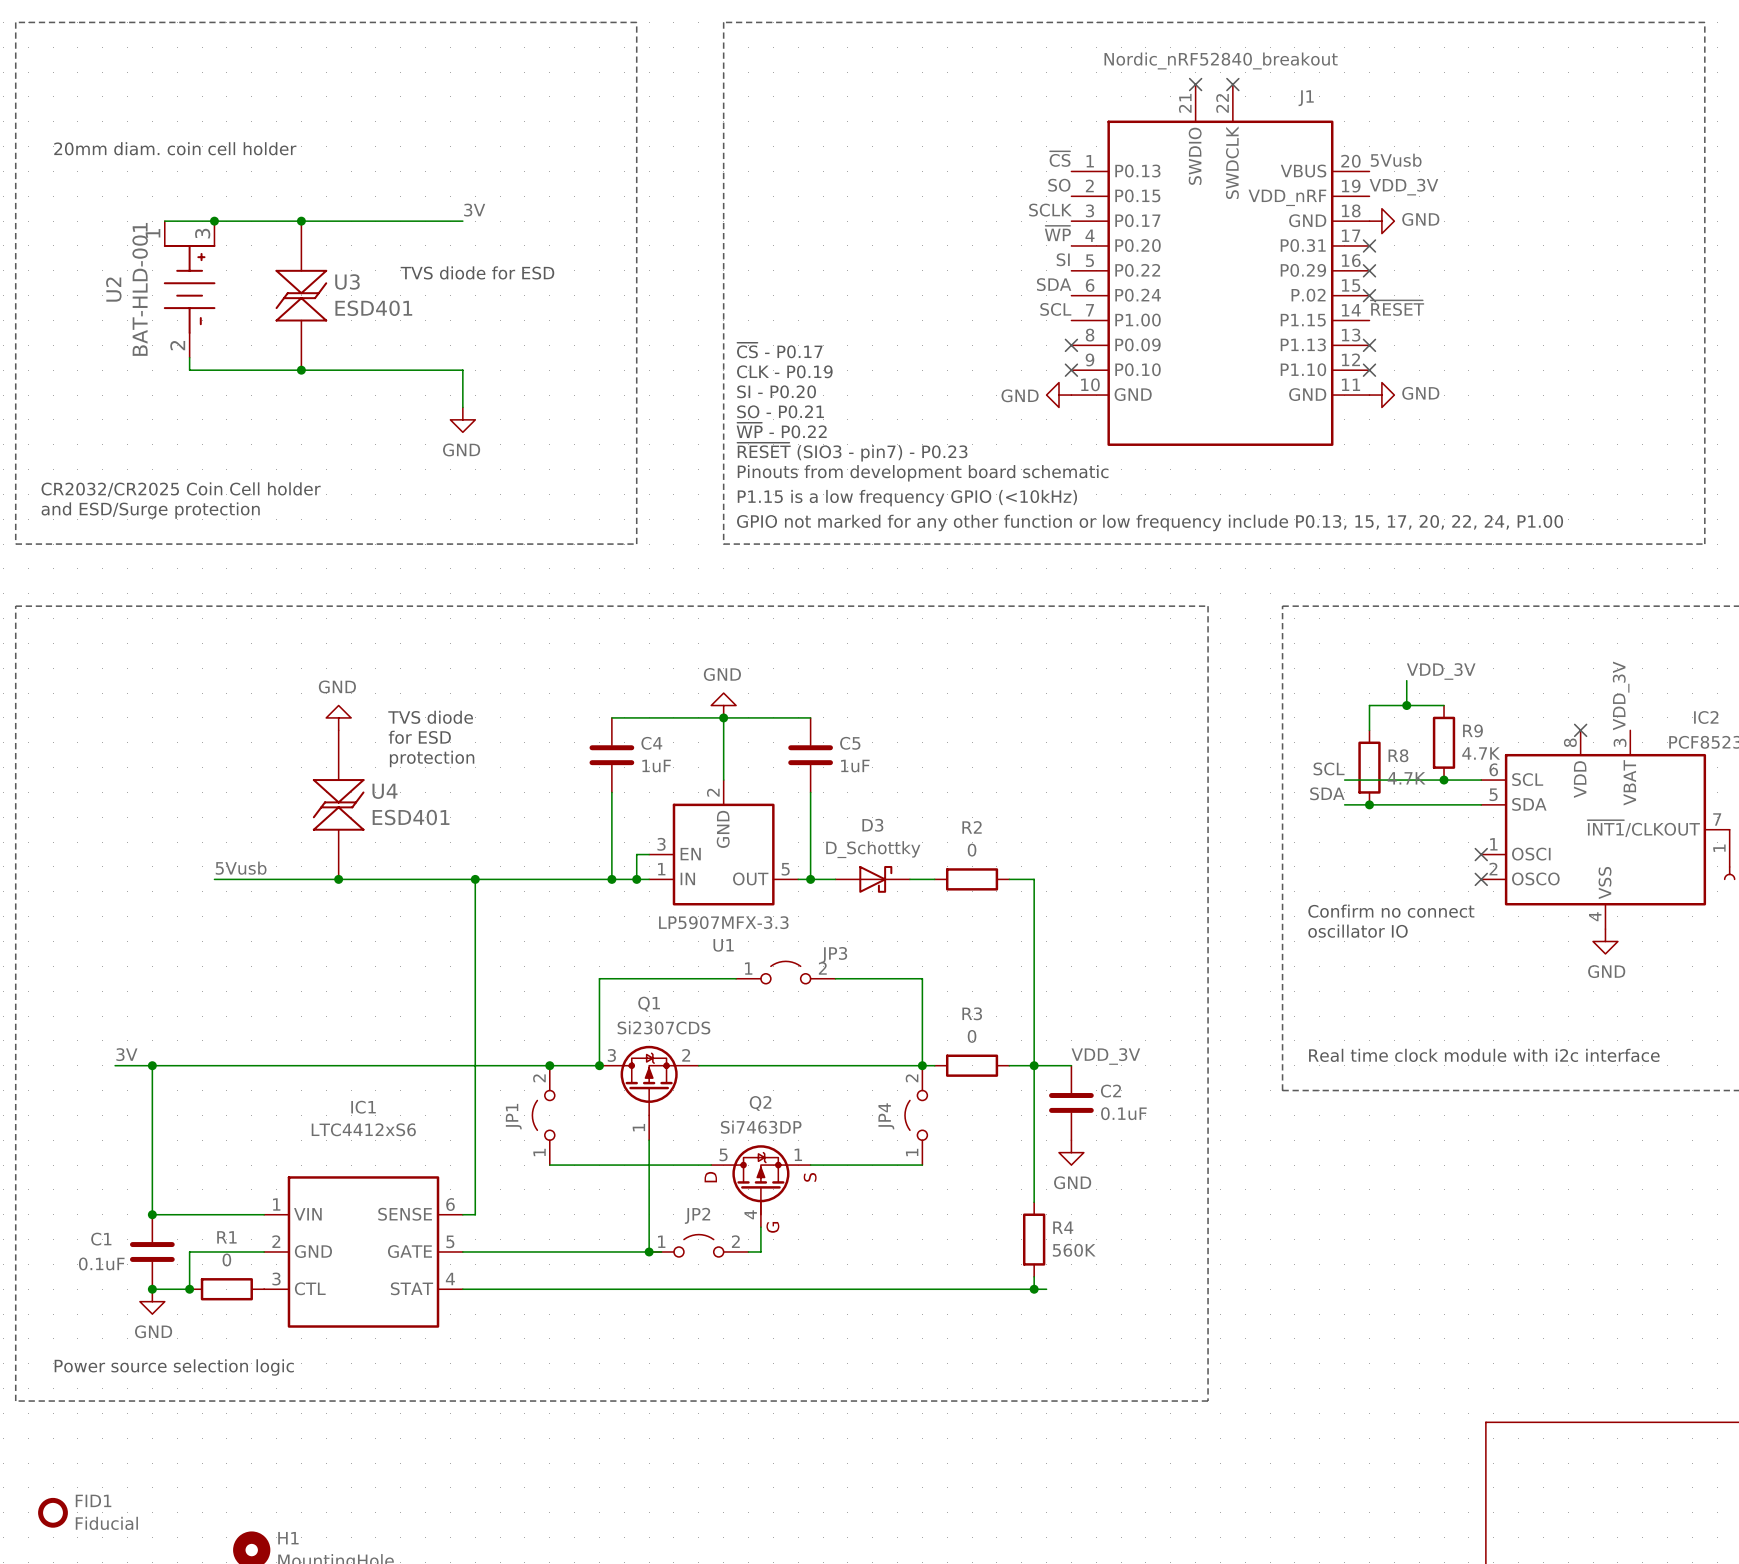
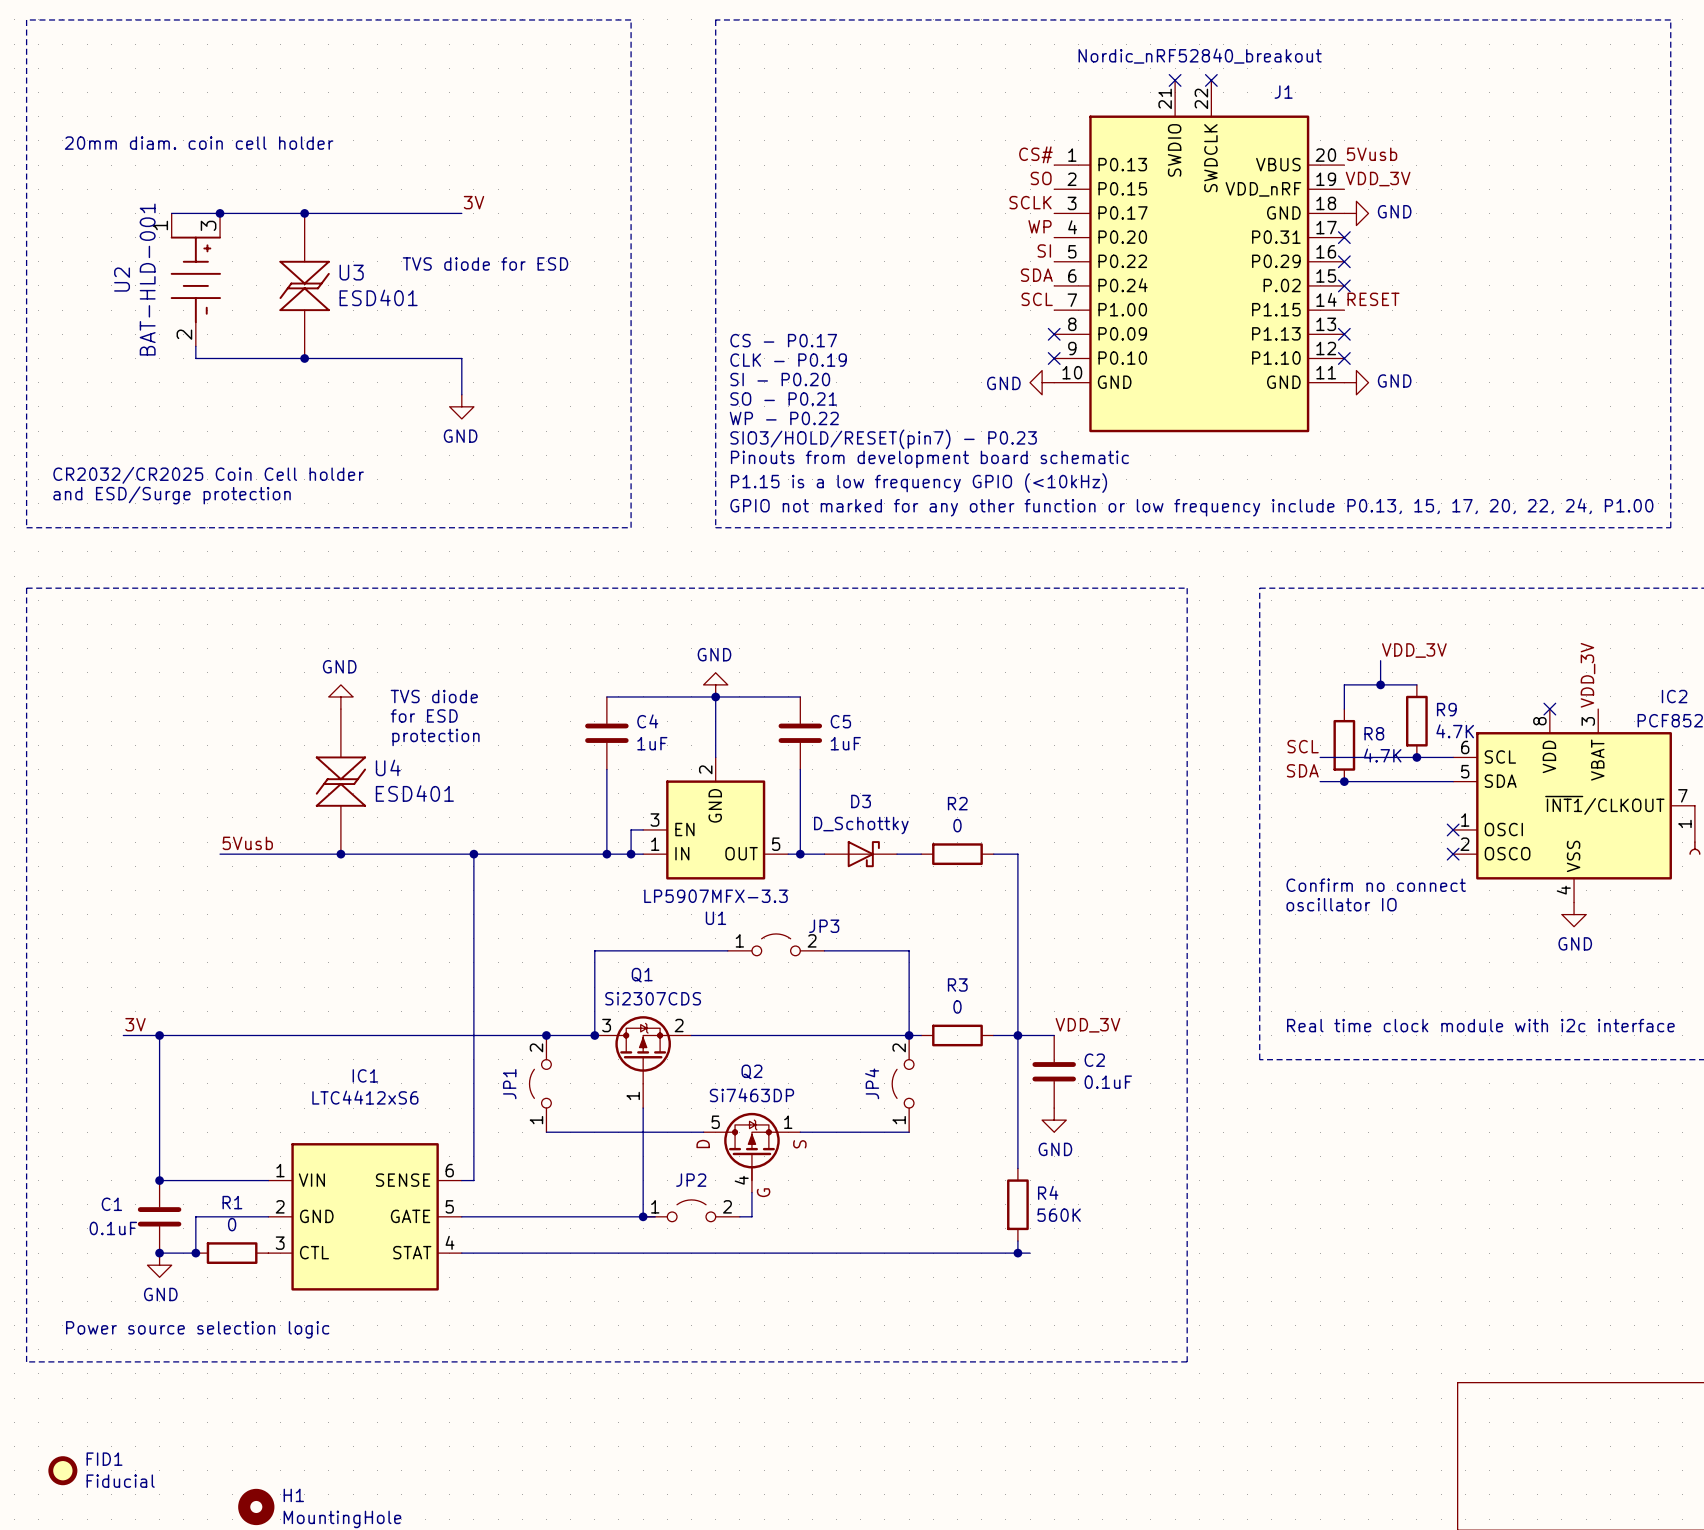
label: ~{CS} (1060, 159) -> CS# (1035, 154)
label: ~{WP} (1057, 233) -> WP (1040, 226)
label: ~{RESET} (1397, 308) -> RESET (1373, 299)
text: ~{CS} - P0.17 (779, 350) -> CS - P0.17 (783, 340)
text: ~{WP} - P0.22 (781, 430) -> WP - P0.22 (784, 418)
text: ~{RESET} (SIO3 - pin7) - P0.23 (852, 452) -> SIO3/HOLD/RESET(pin7) - P0.23 (883, 439)

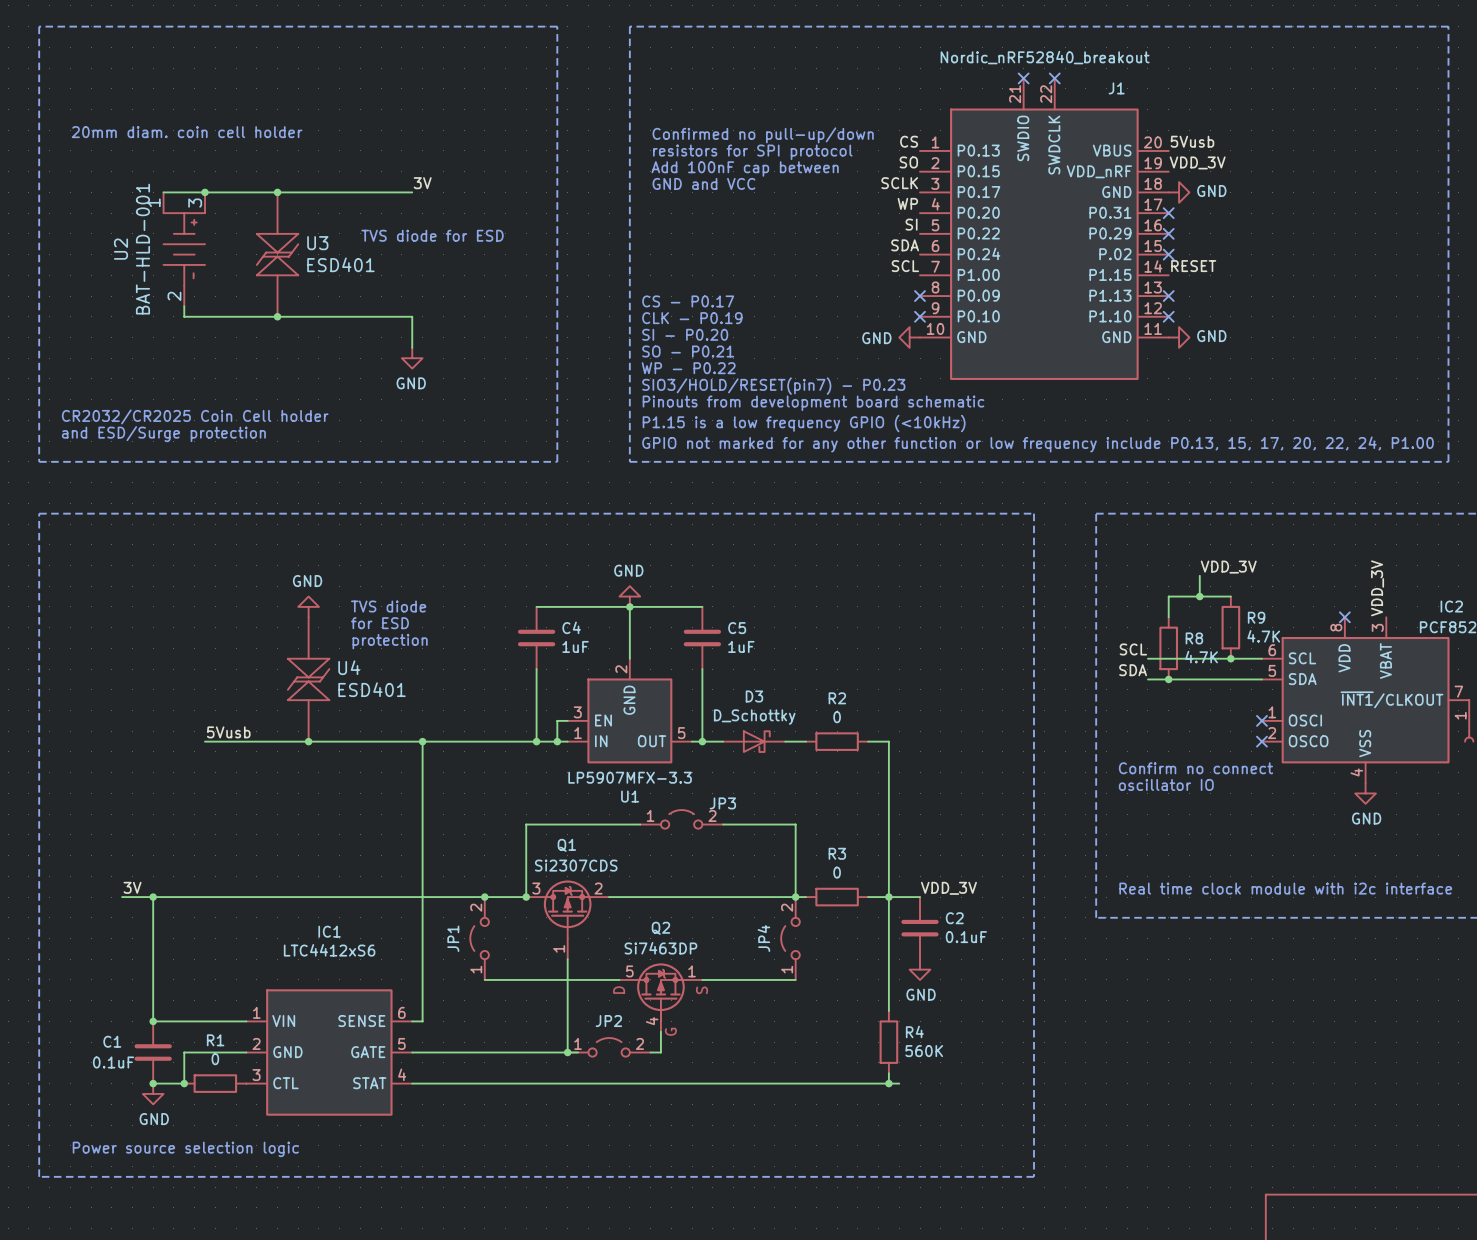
text: none -> Confirmed no pull-up/down (763, 135)
label: CS# (1035, 154) -> CS (909, 141)
text: none -> resistors for SPI protocol (752, 152)
text: none -> Add 100nF cap between (745, 168)
text: none -> GND and VCC (703, 183)

